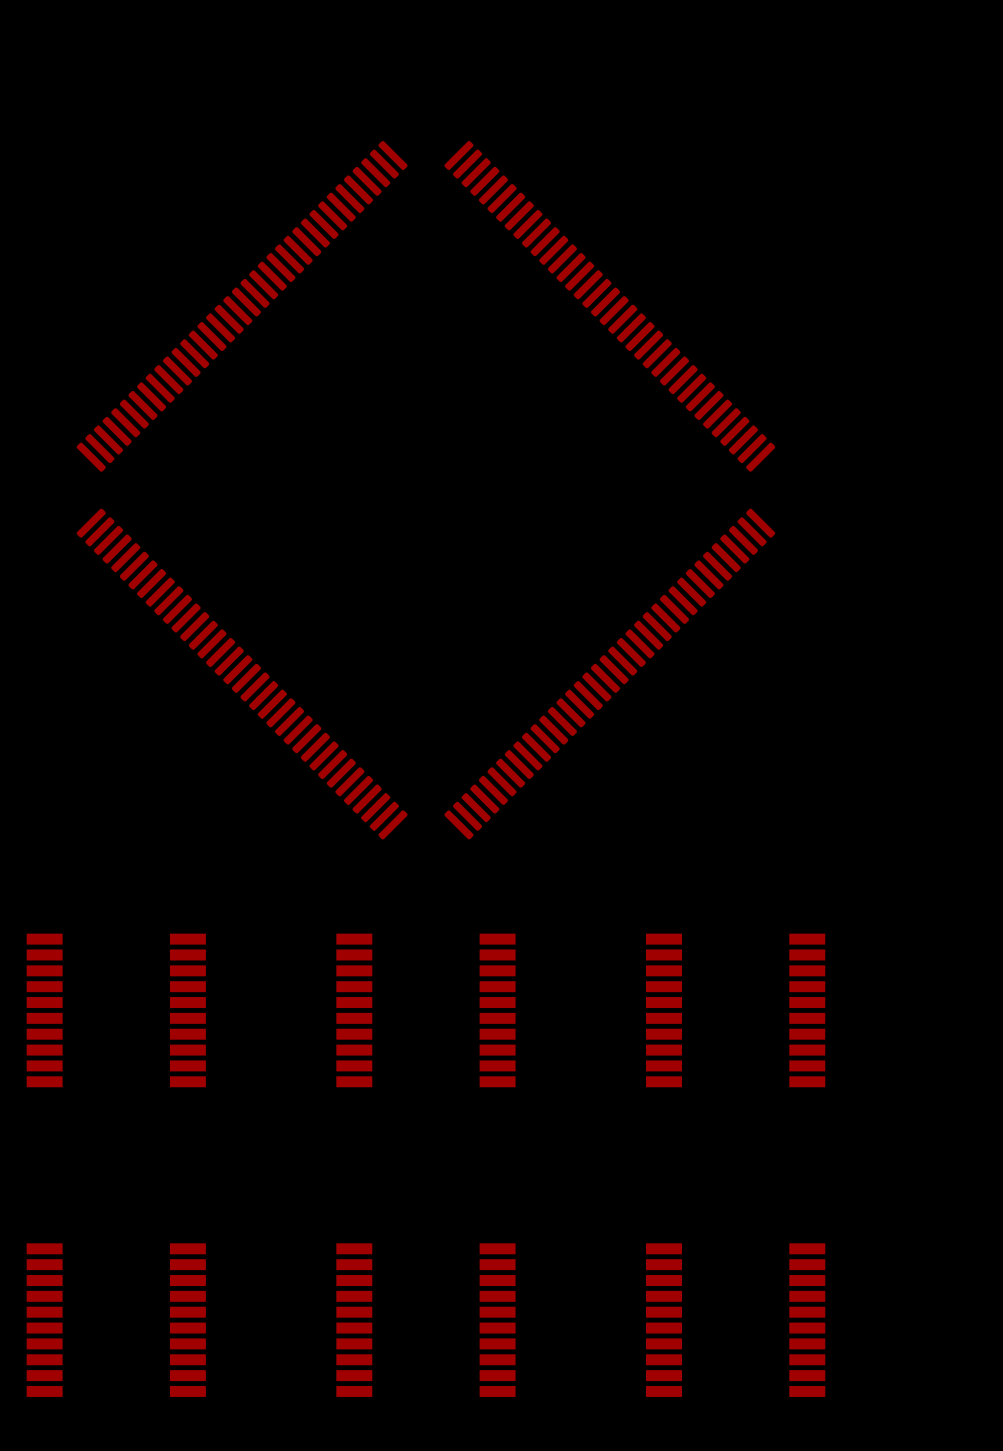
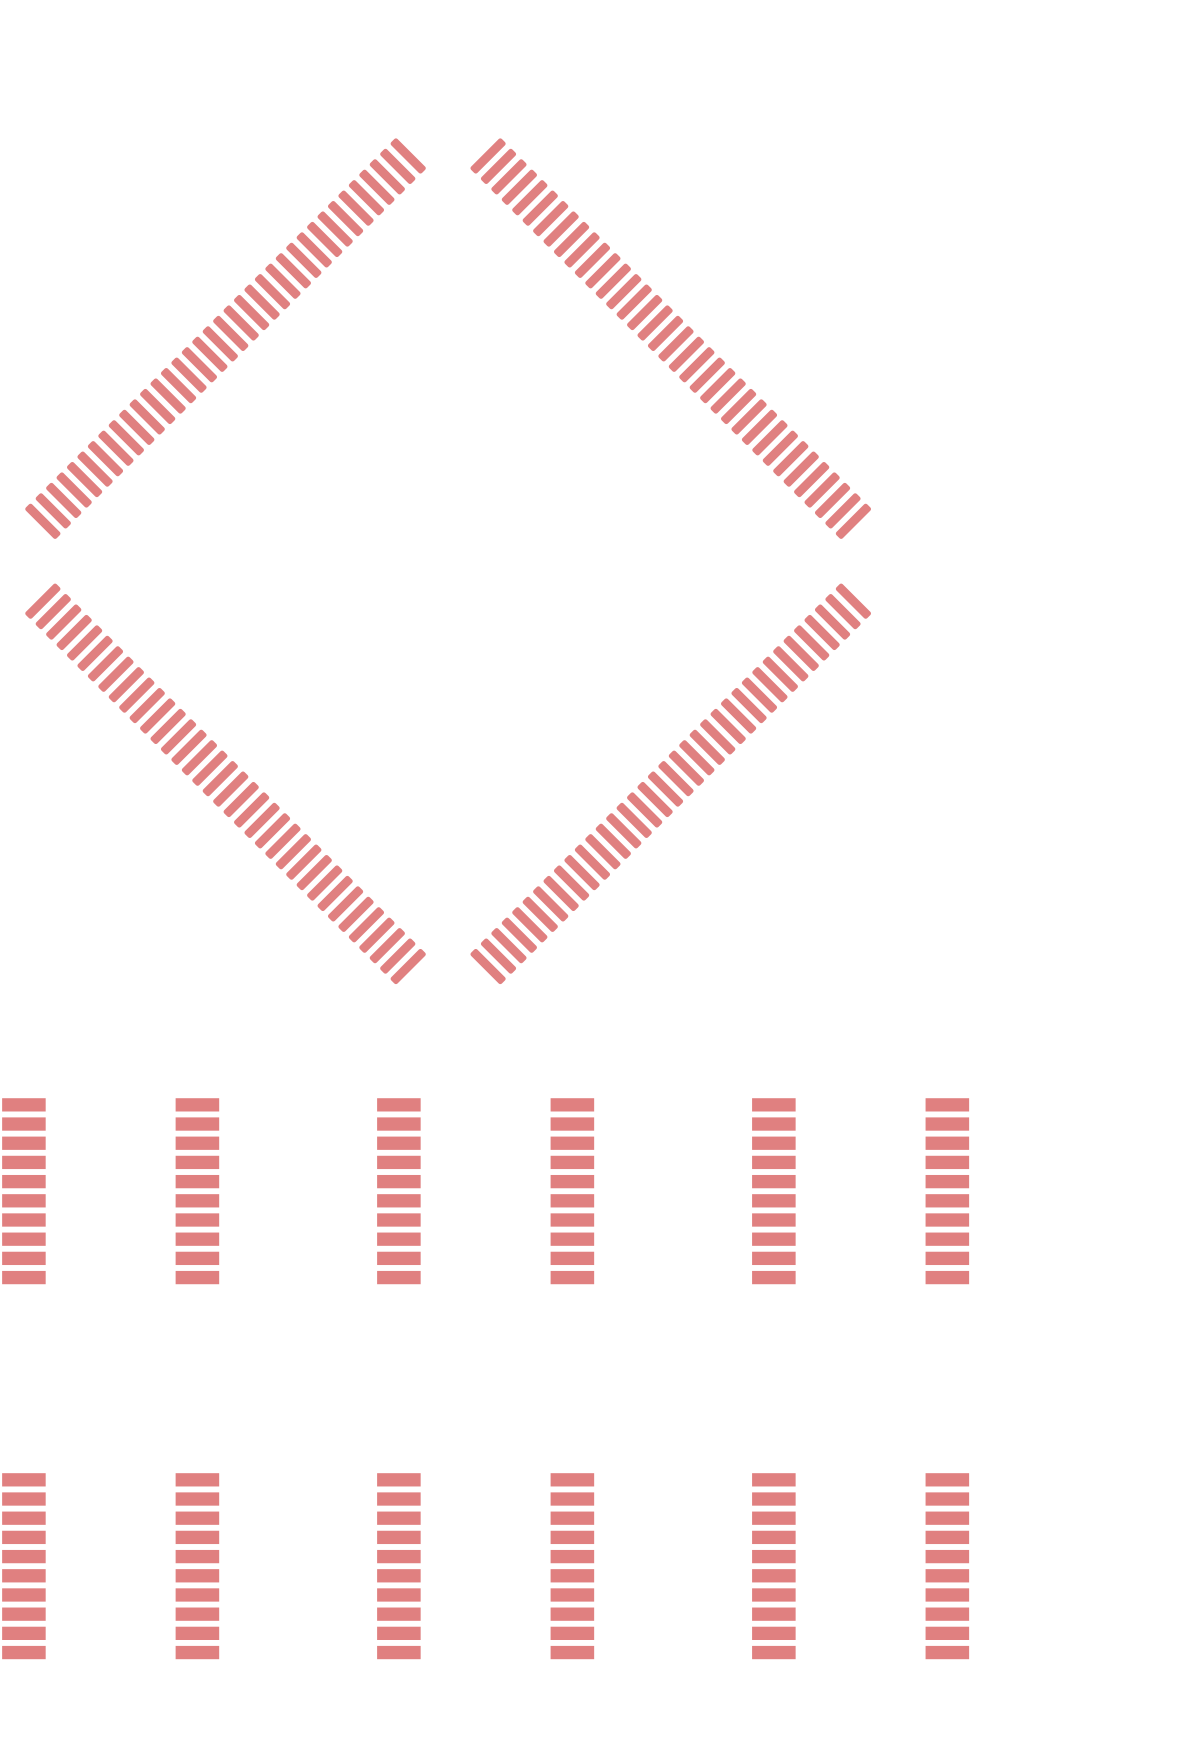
part position: (425, 490) -> (448, 561)

